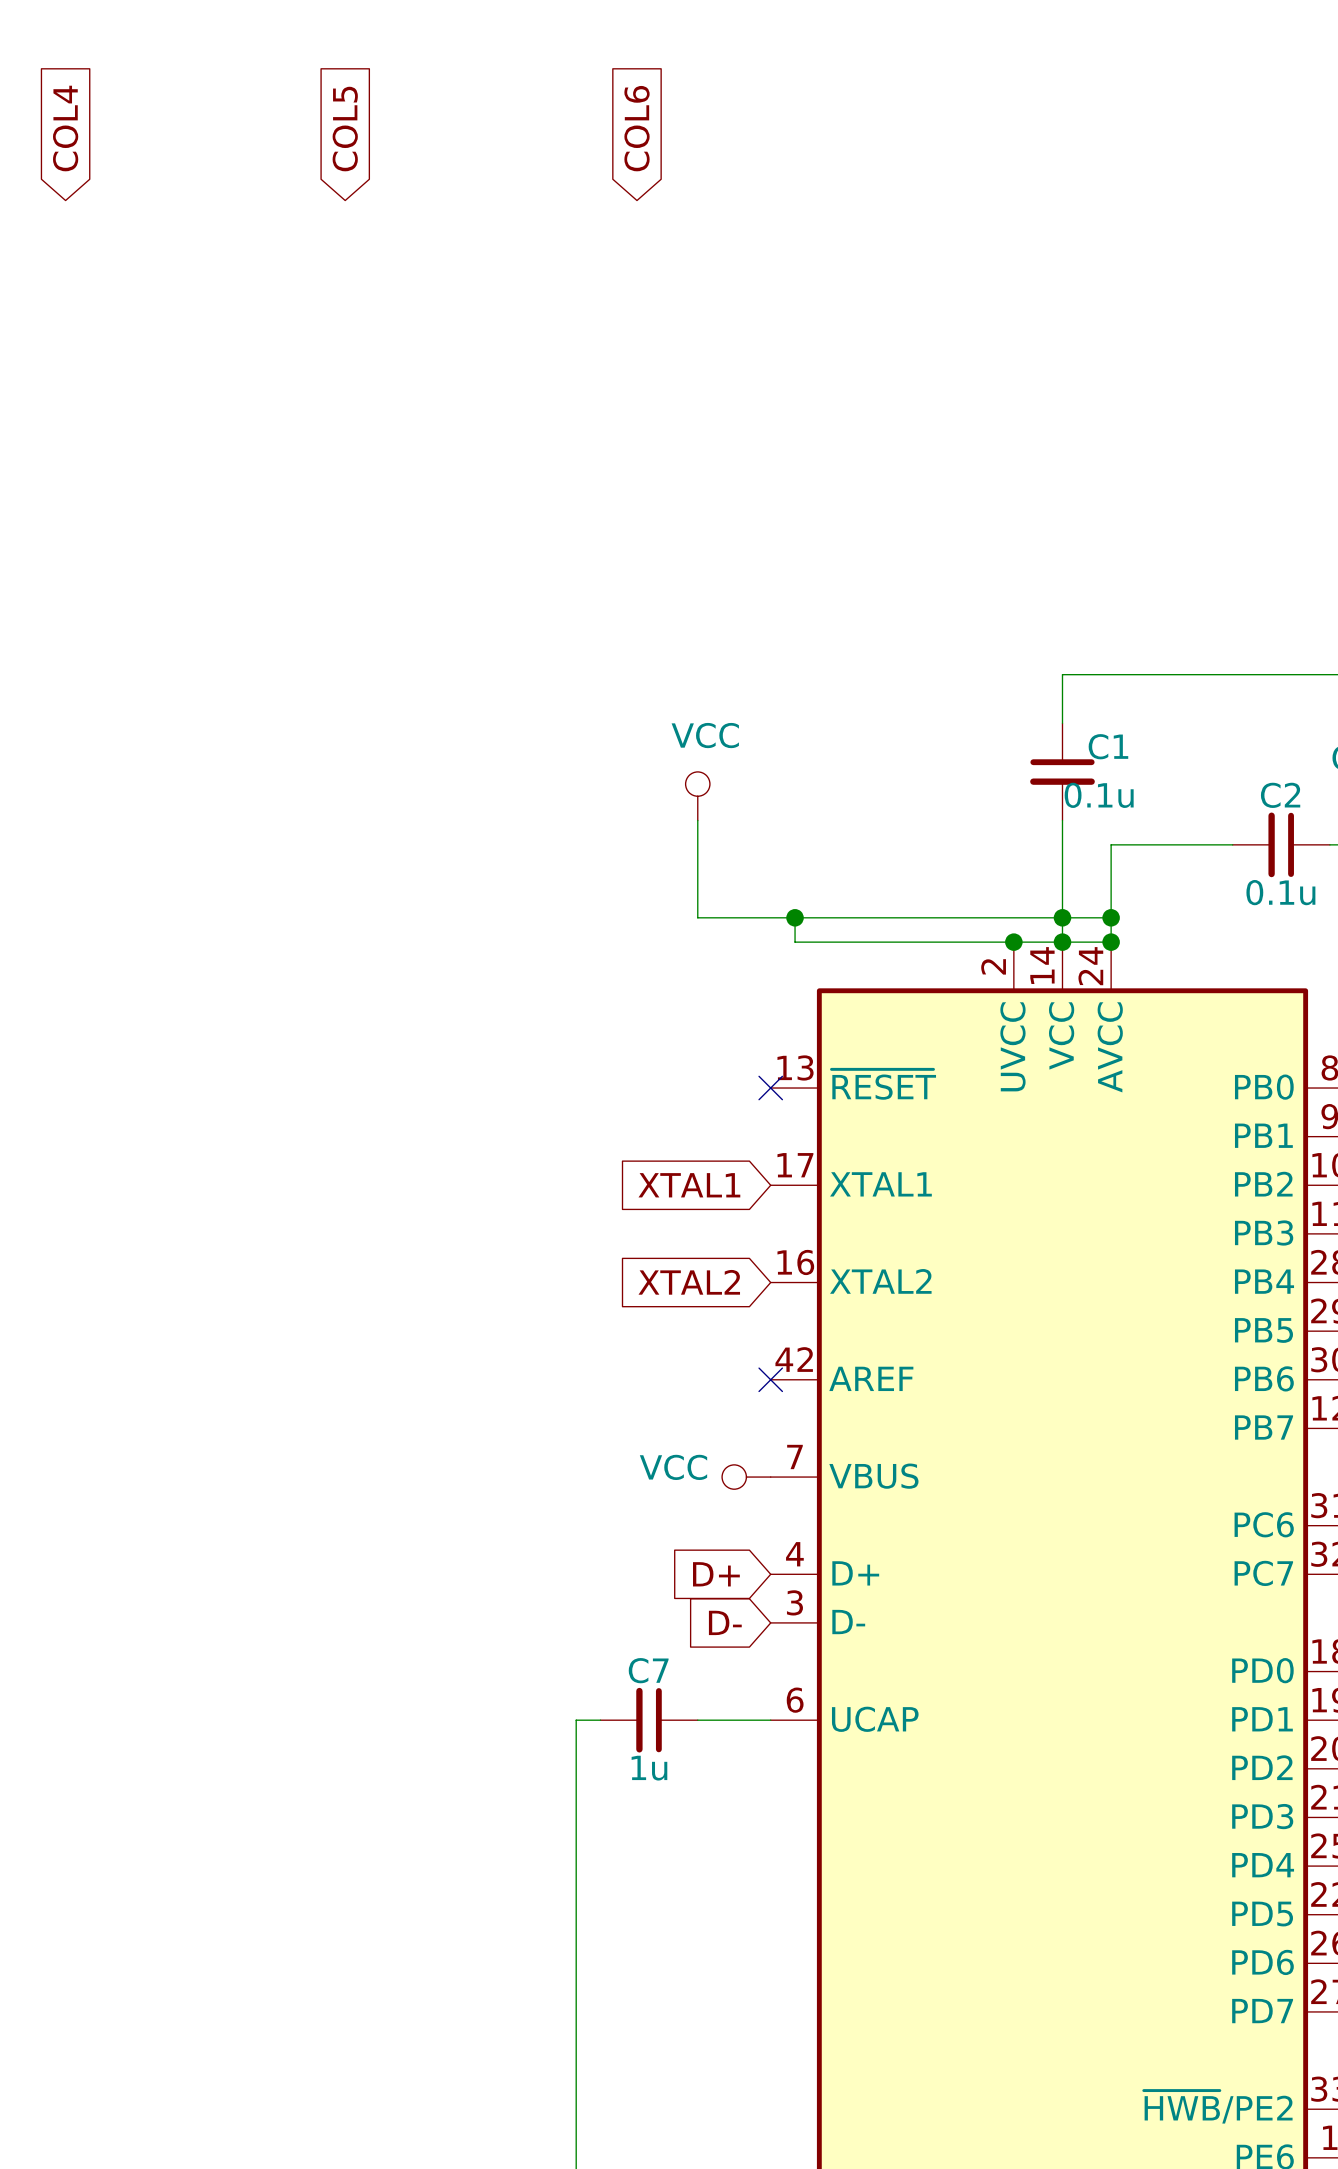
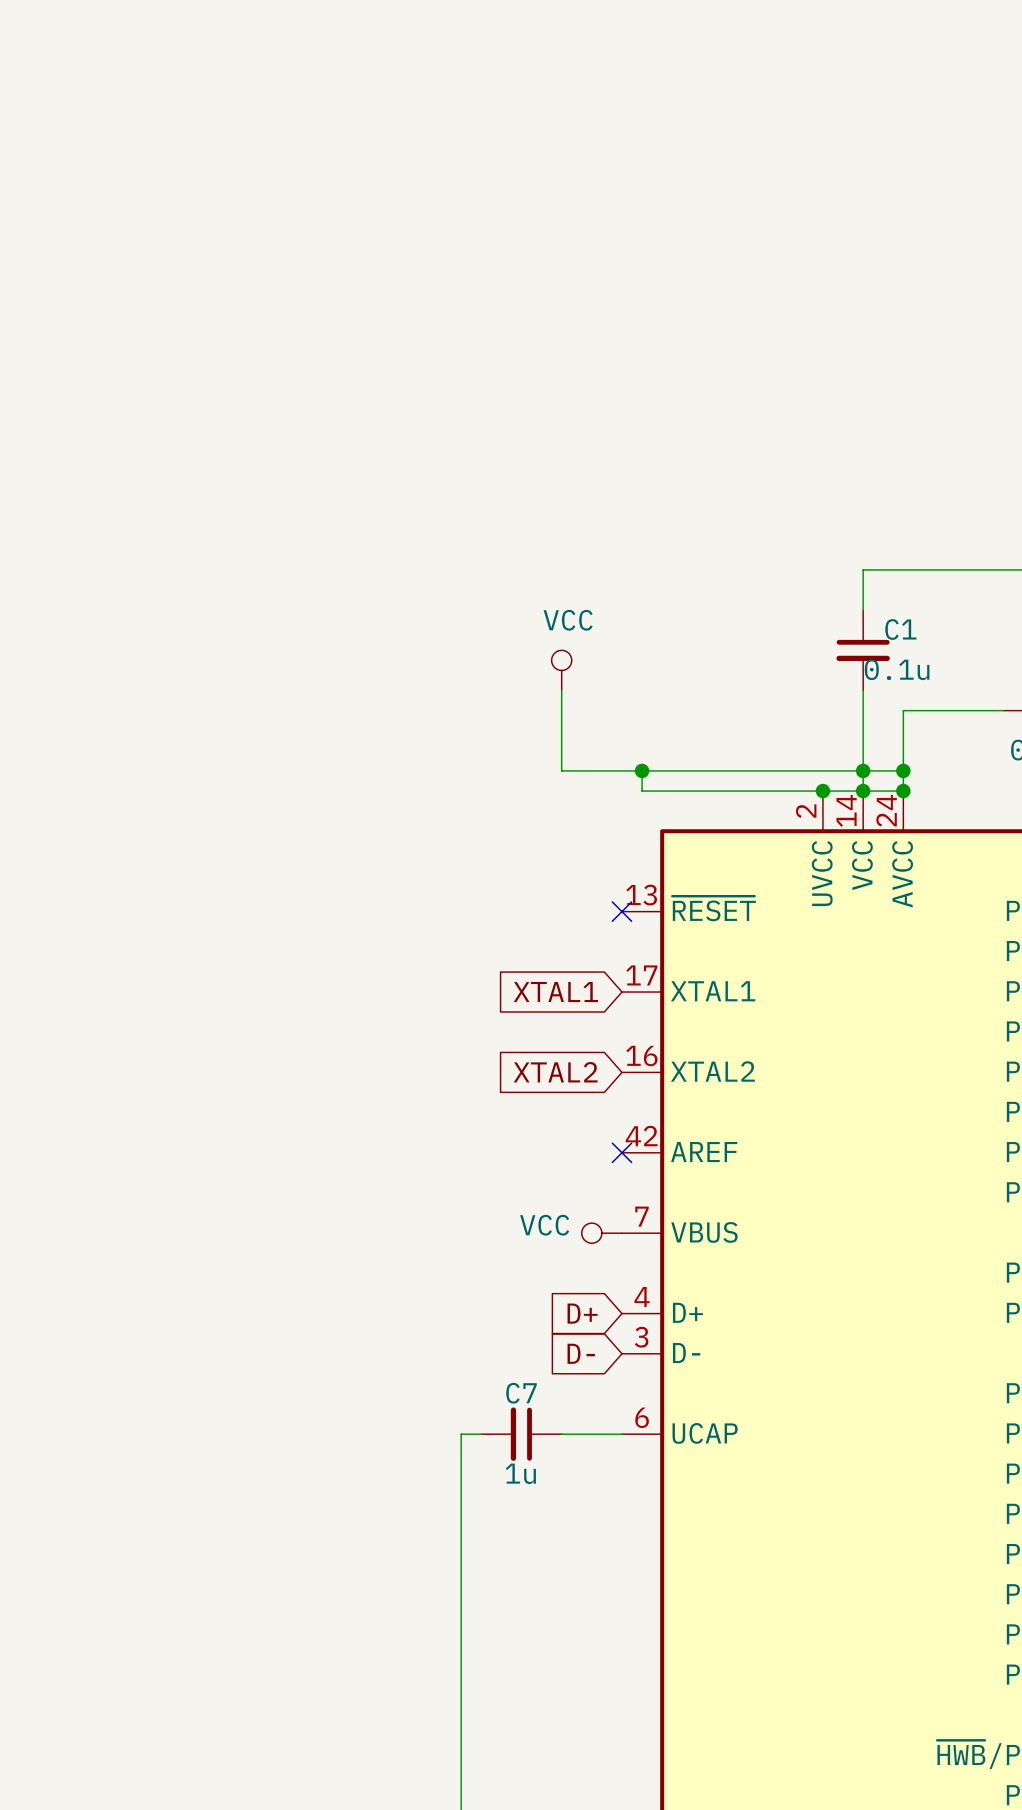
global label: COL4 (65, 128) -> none
global label: COL6 (637, 128) -> none
global label: COL5 (345, 129) -> none

